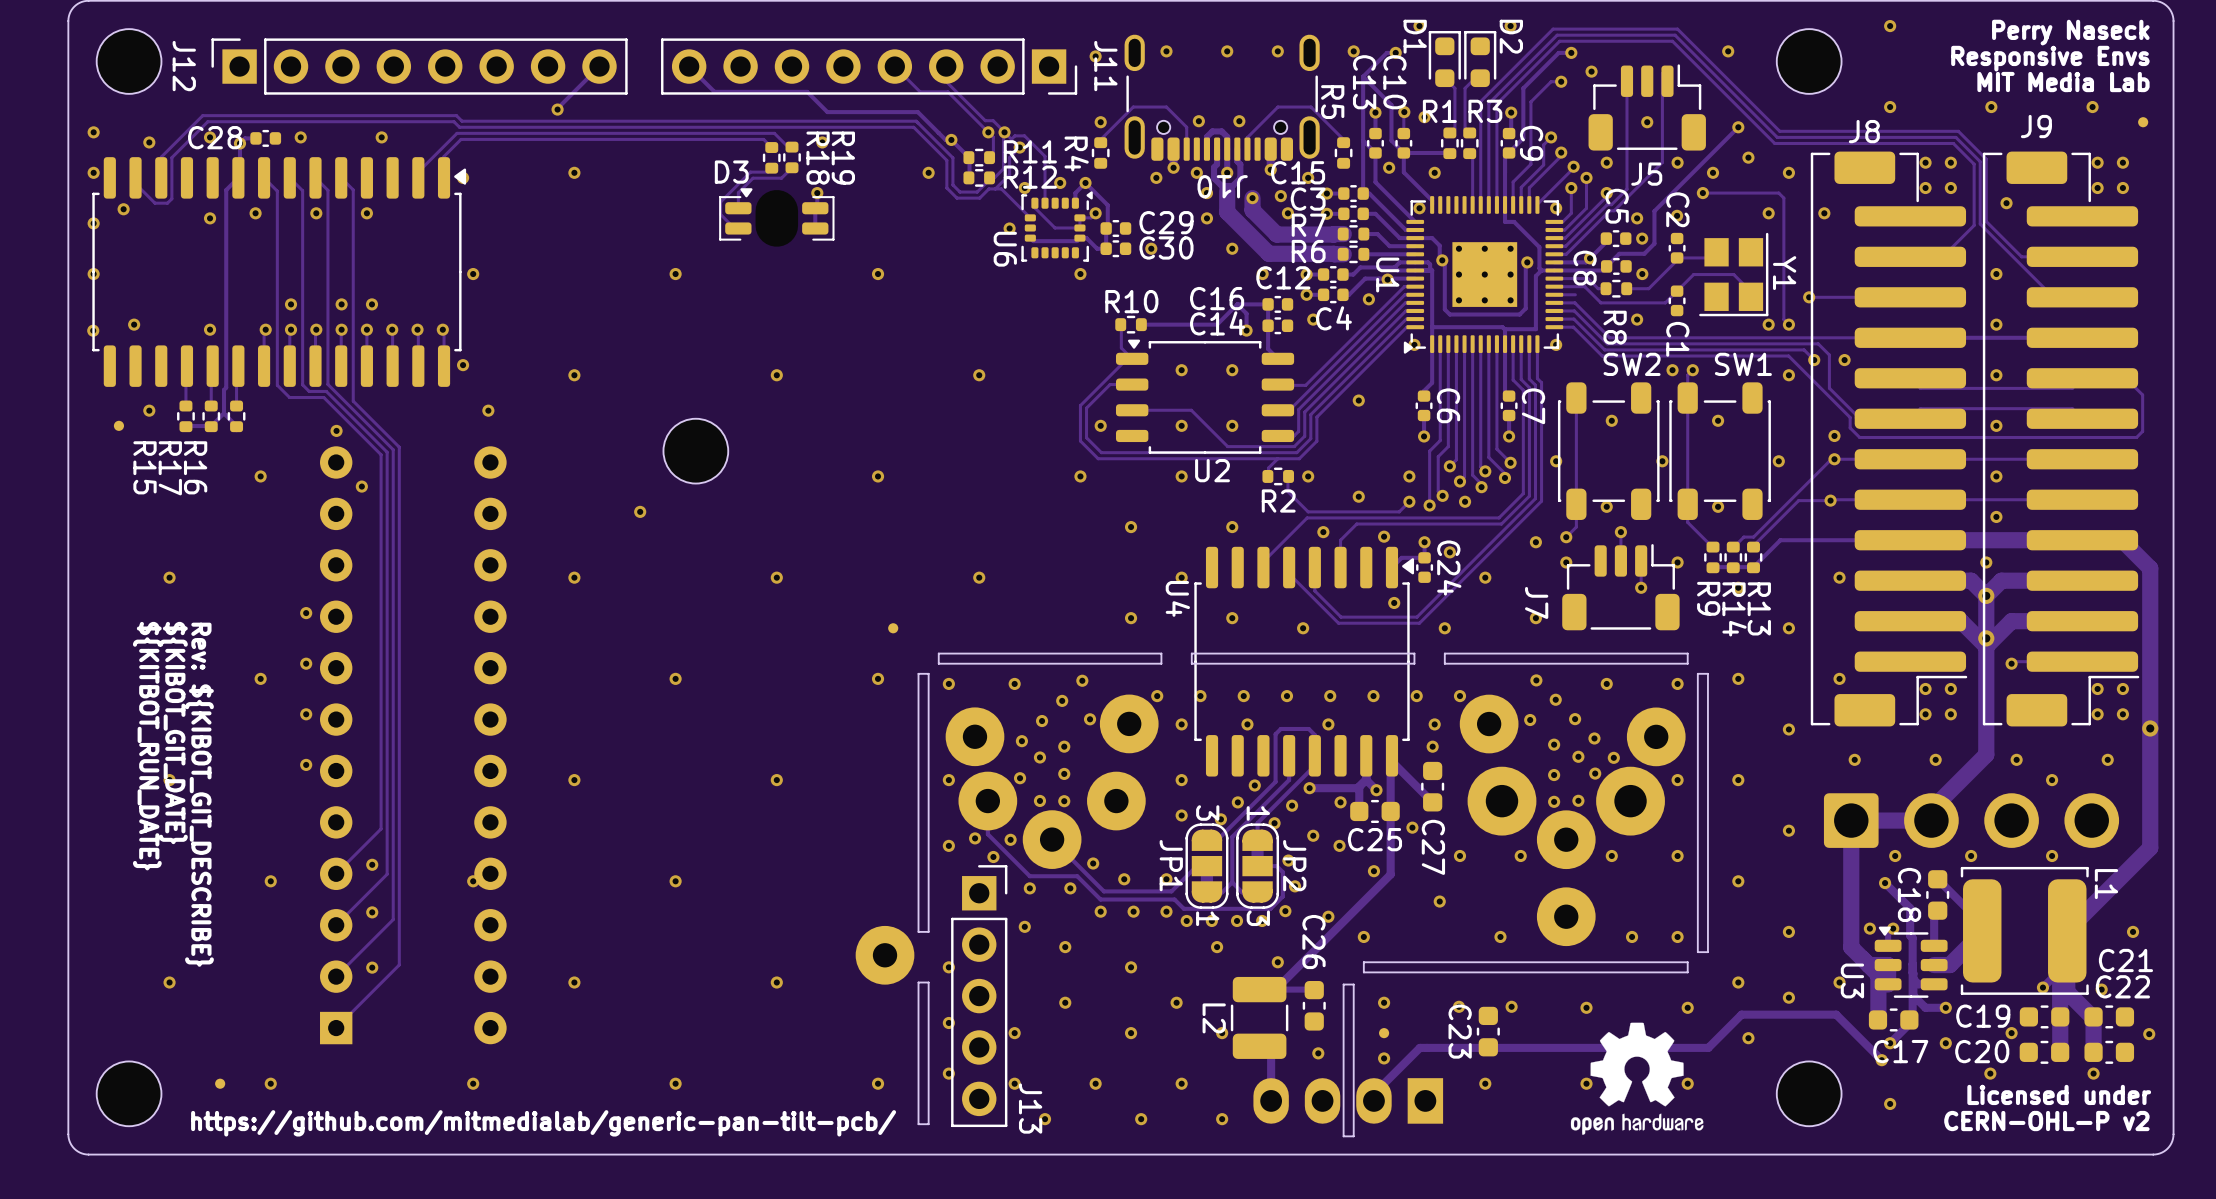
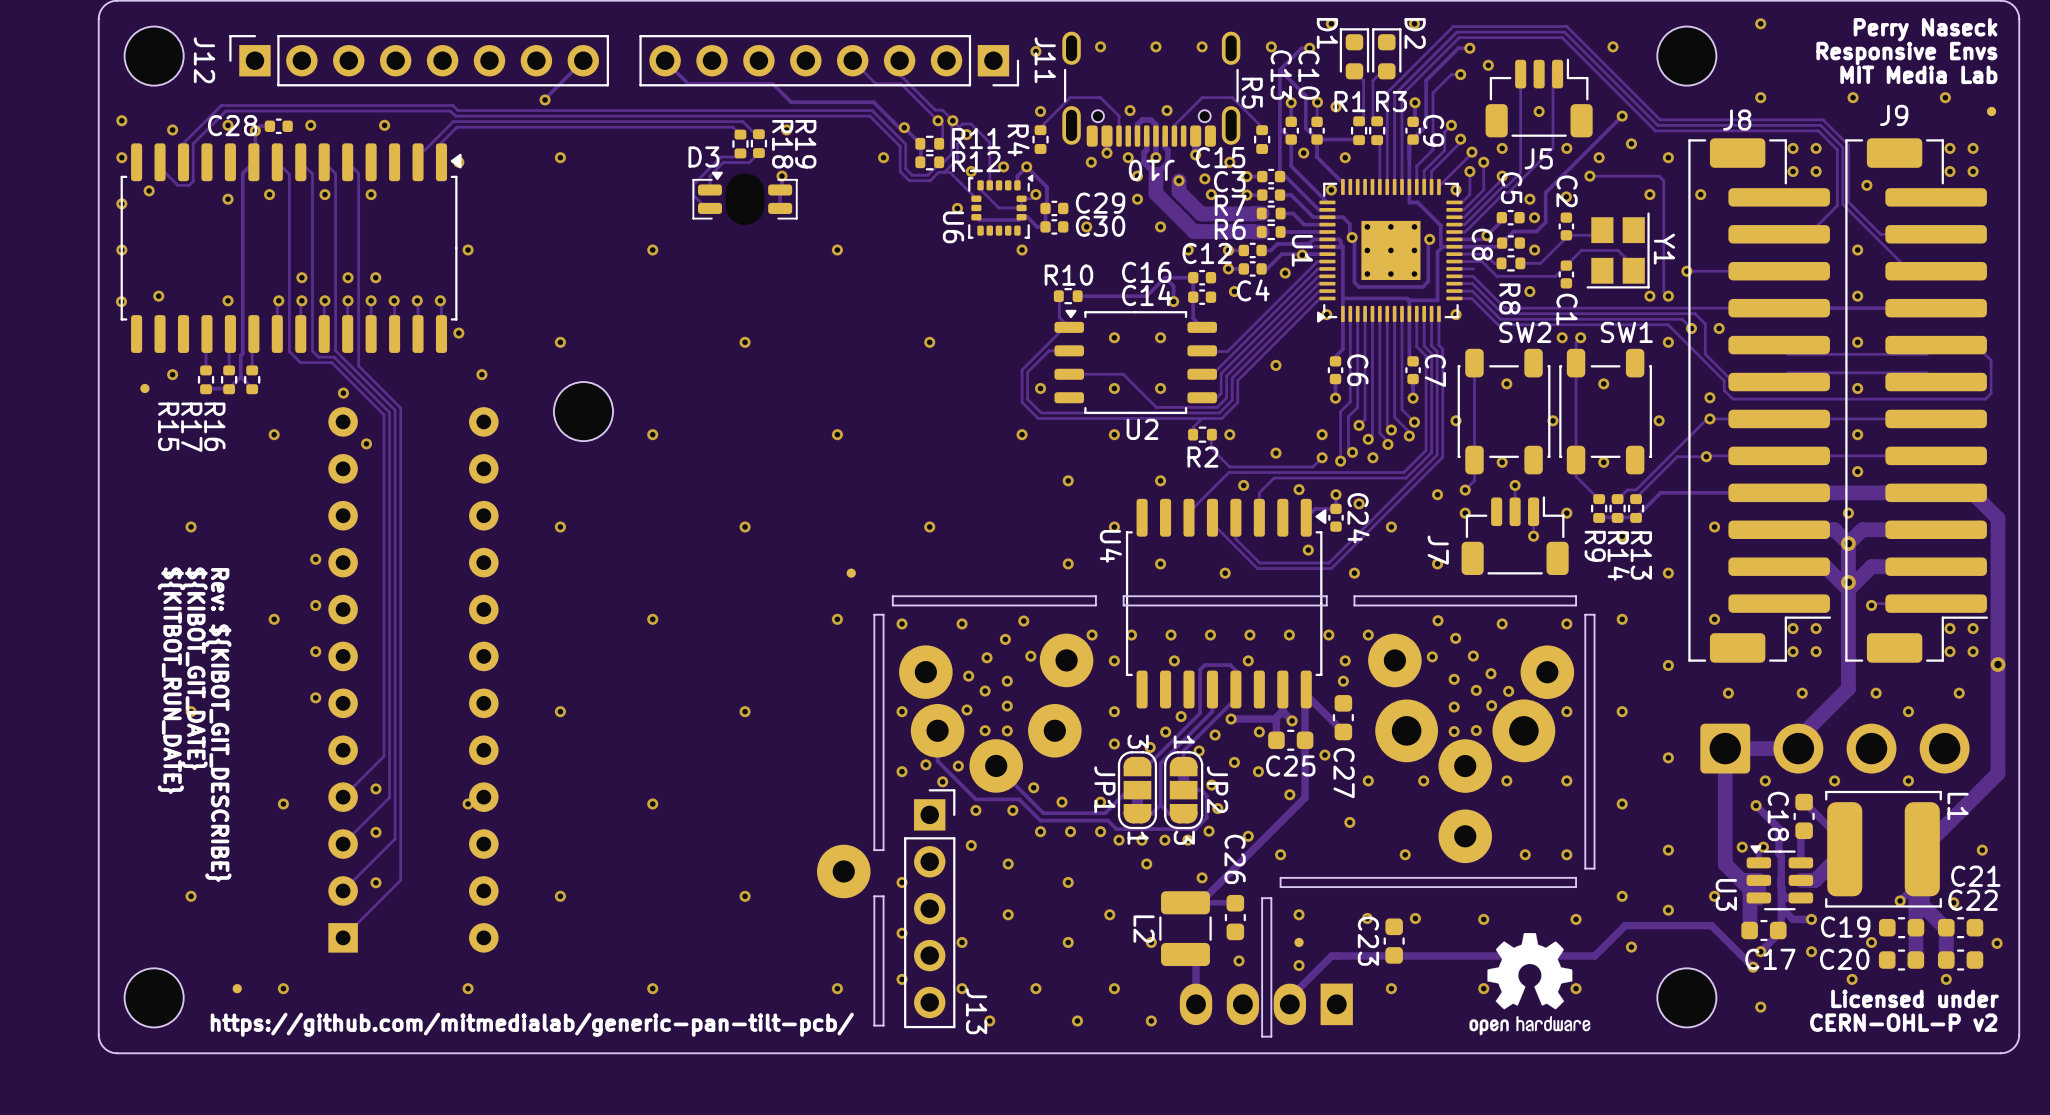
part position: (695, 451) -> (583, 411)
via position: (640, 511) -> (652, 434)

